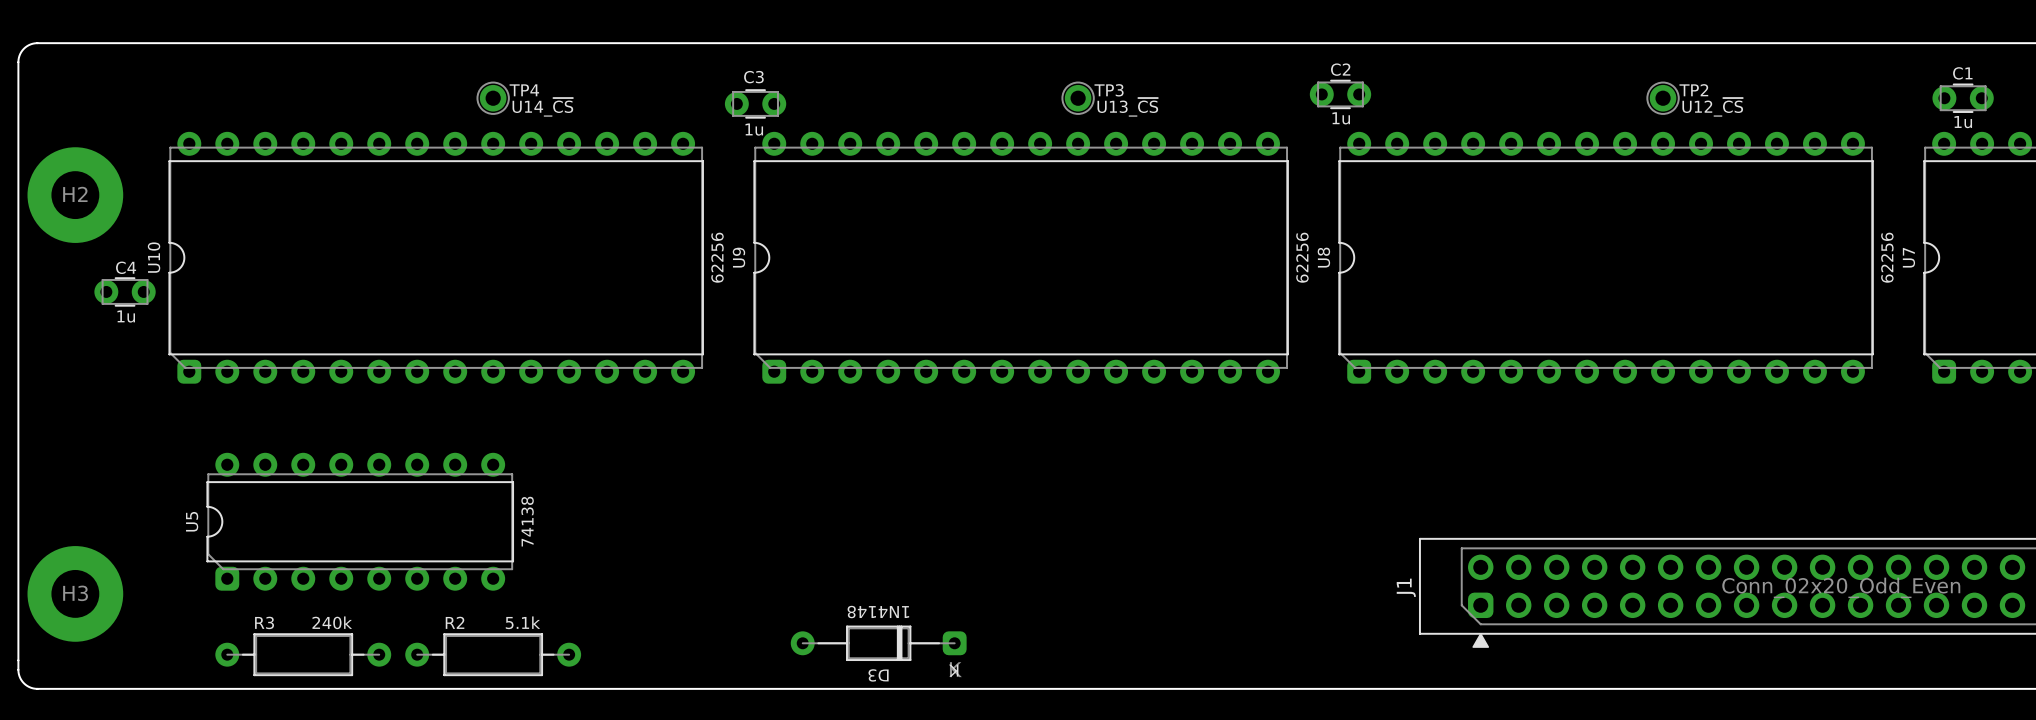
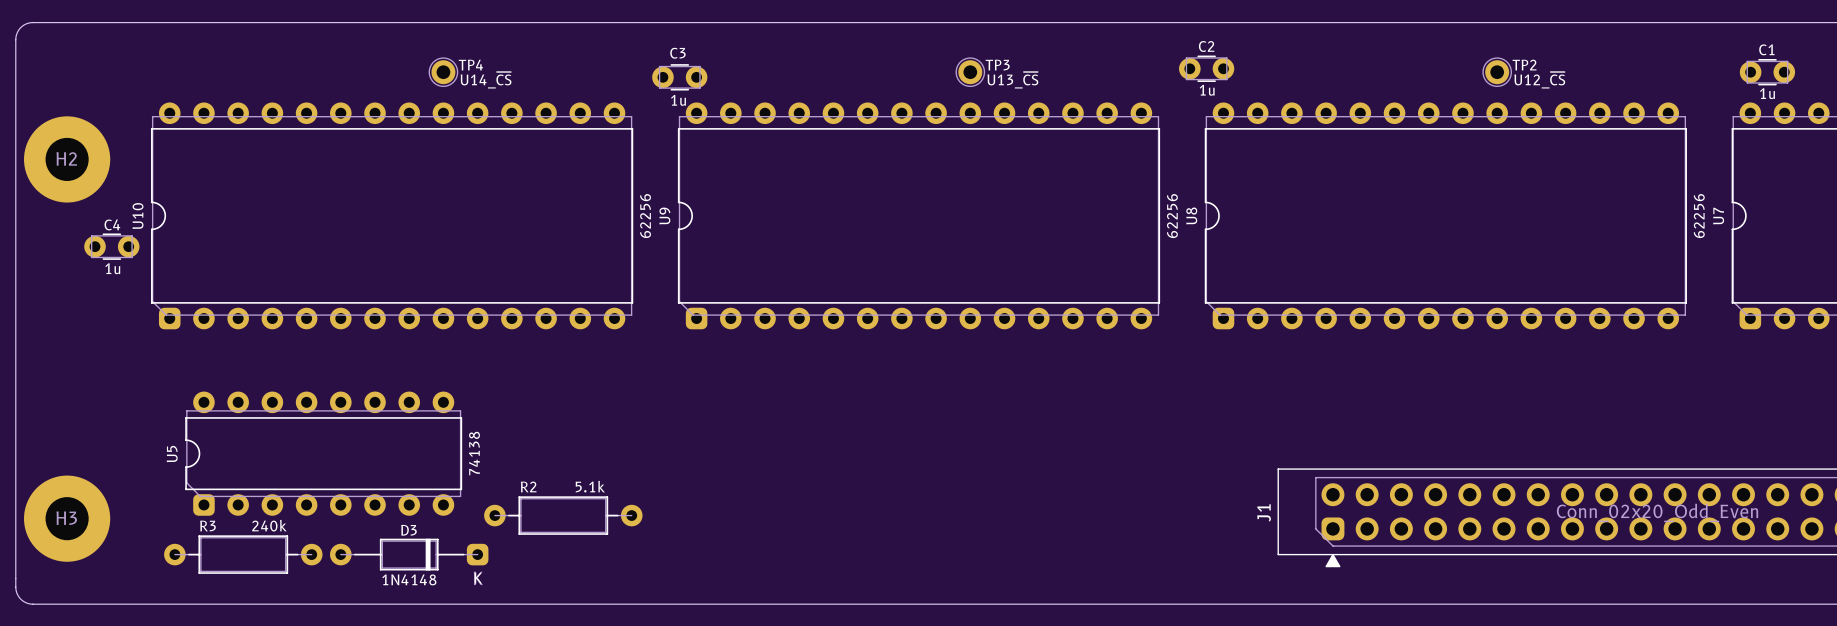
D3 value position: 1N4148 (878, 612) -> 1N4148 (409, 579)
D3 footprint: [790, 625, 967, 661] -> [330, 538, 489, 571]
R3 position: (303, 654) -> (243, 554)
R2 position: (493, 654) -> (563, 515)
D3 name position: D3 (878, 675) -> D3 (408, 530)

